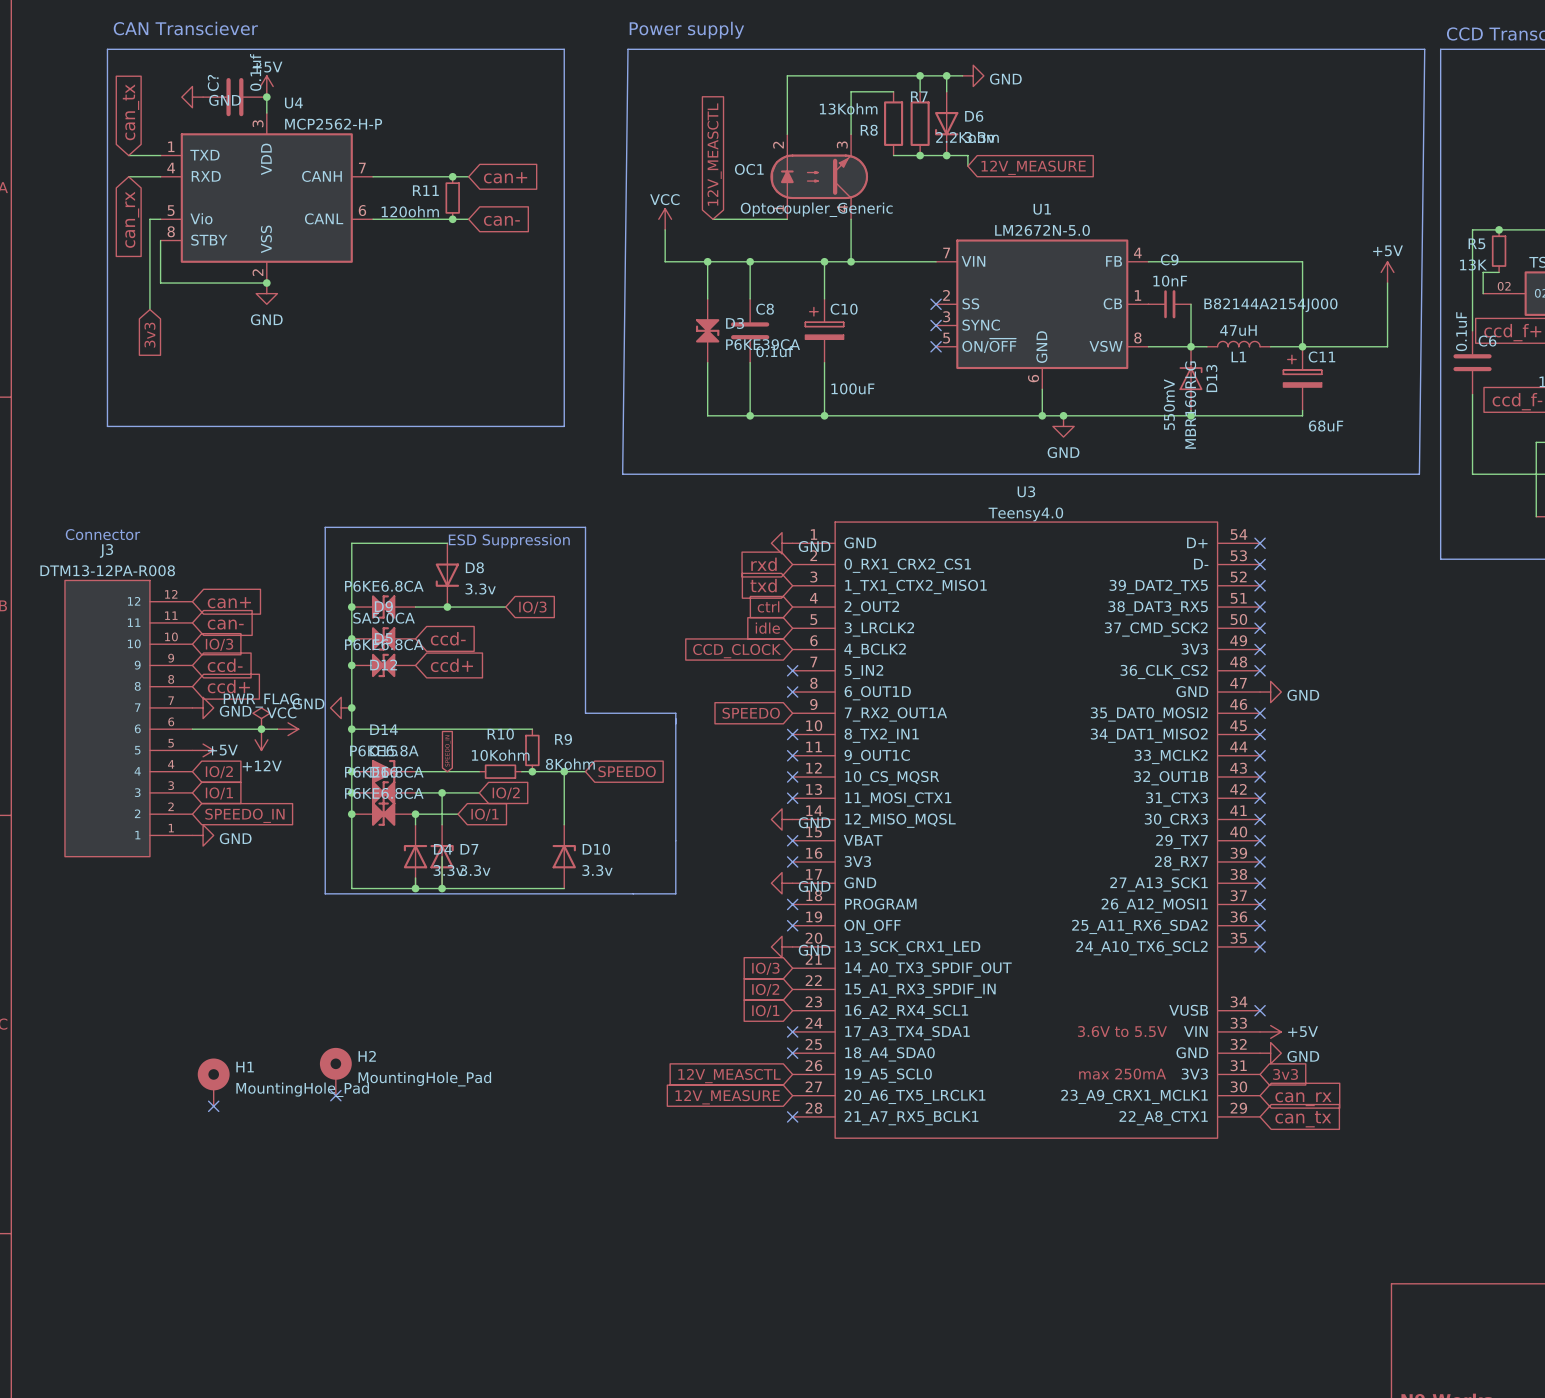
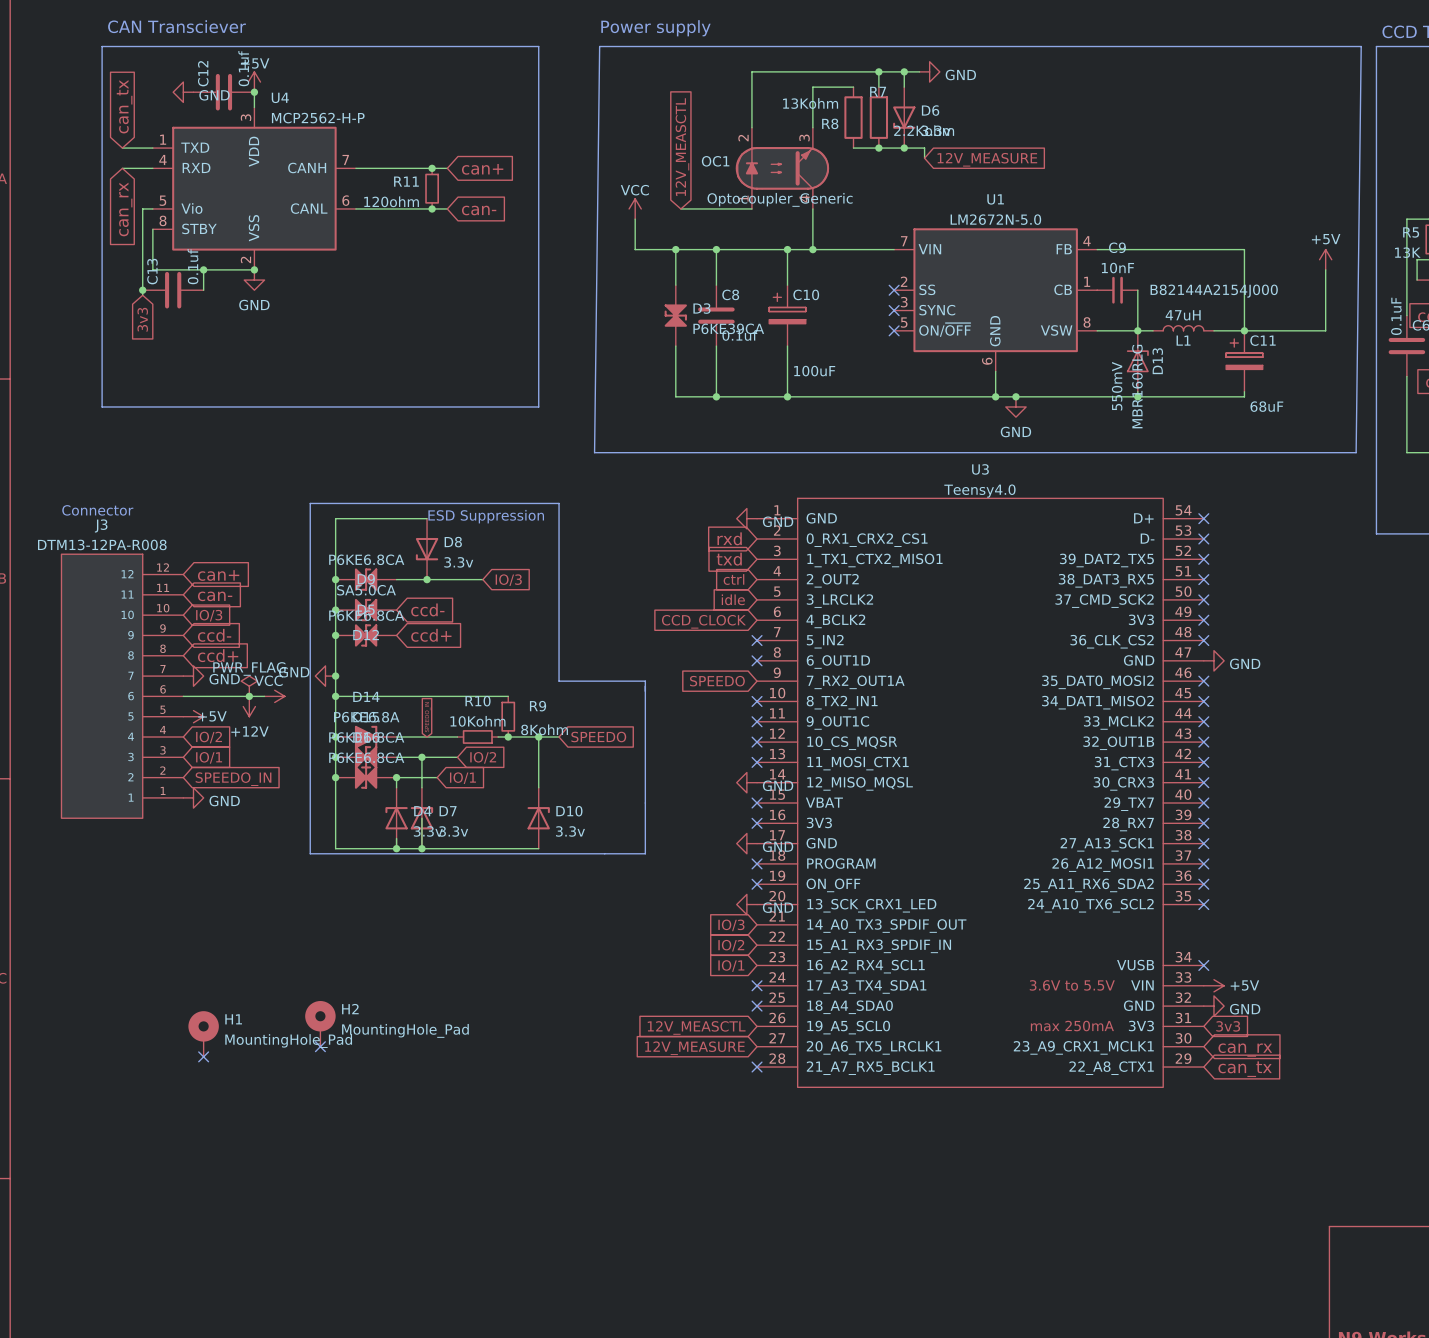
C? name: C? (213, 82) -> C12 (203, 73)
wire: none -> (203, 269) (203, 290)
junction: none -> (203, 269)
junction: none -> (142, 290)
C13: none -> 0.1uf (173, 290)

